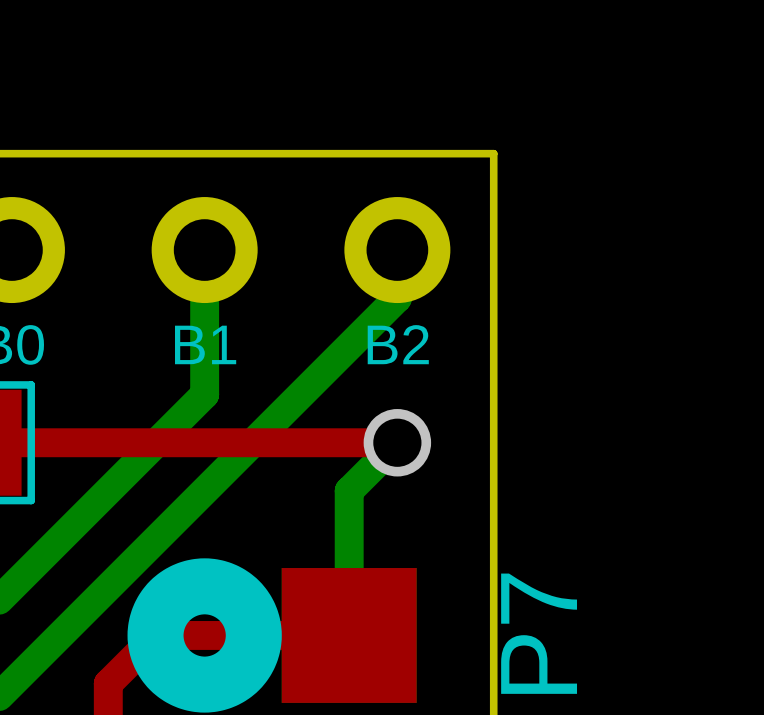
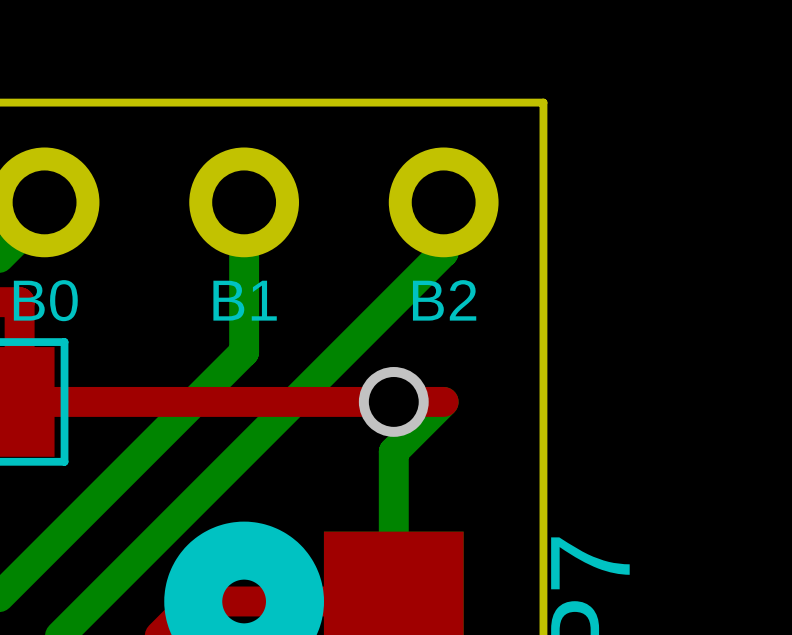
via position: (397, 442) -> (393, 401)

